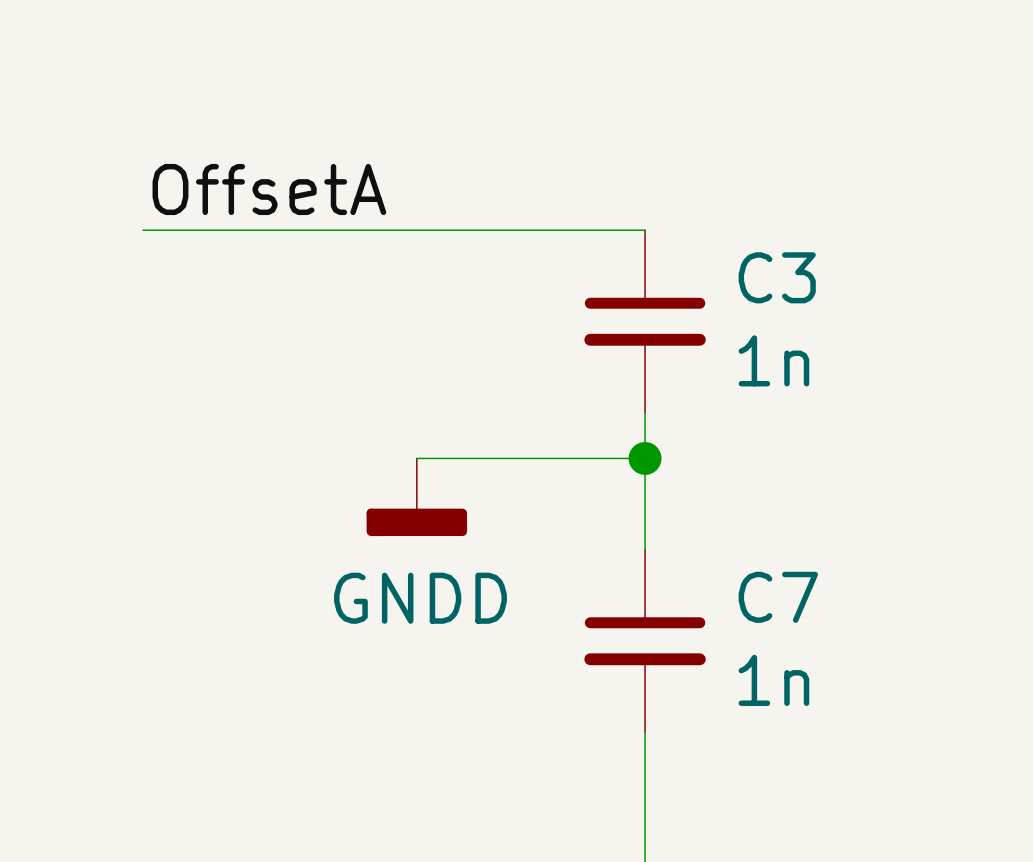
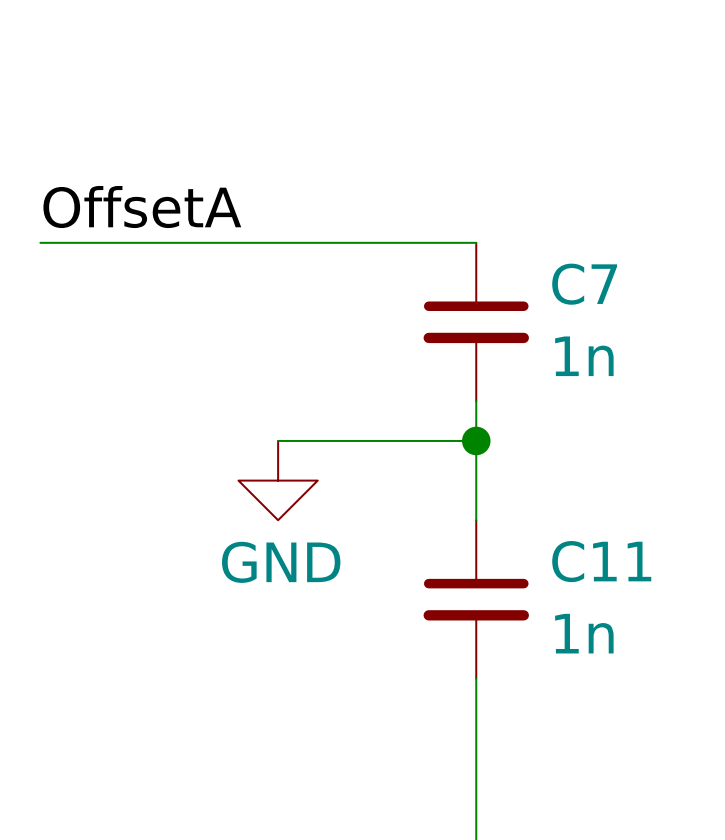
C3 name: C3 (777, 277) -> C7 (584, 284)
power symbol: GNDD (416, 497) -> GND (278, 480)
C7 name: C7 (778, 597) -> C11 (601, 561)

